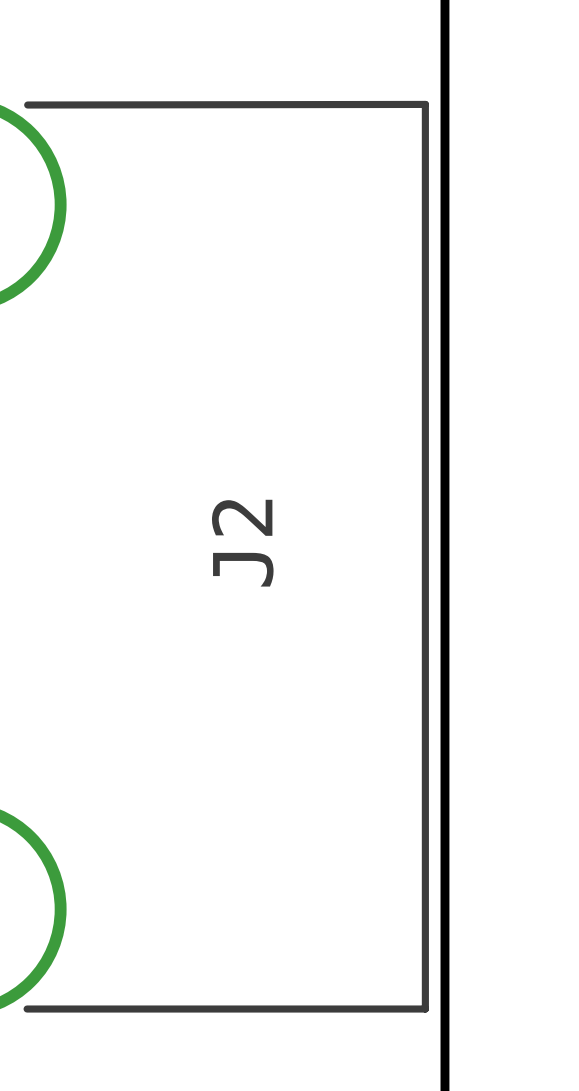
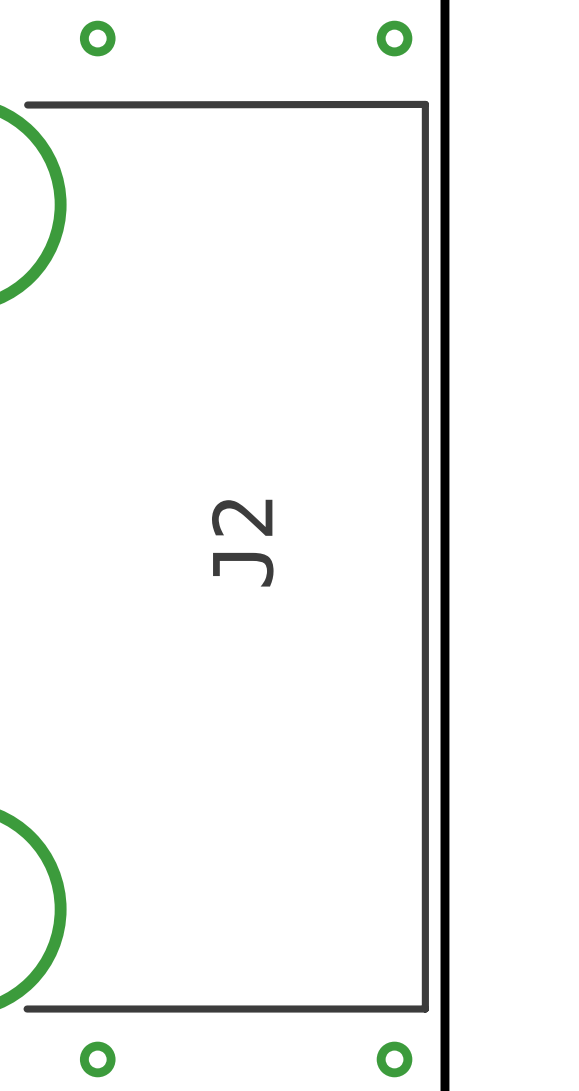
via: none -> (97, 38)
via: none -> (394, 38)
via: none -> (97, 1059)
via: none -> (394, 1059)

